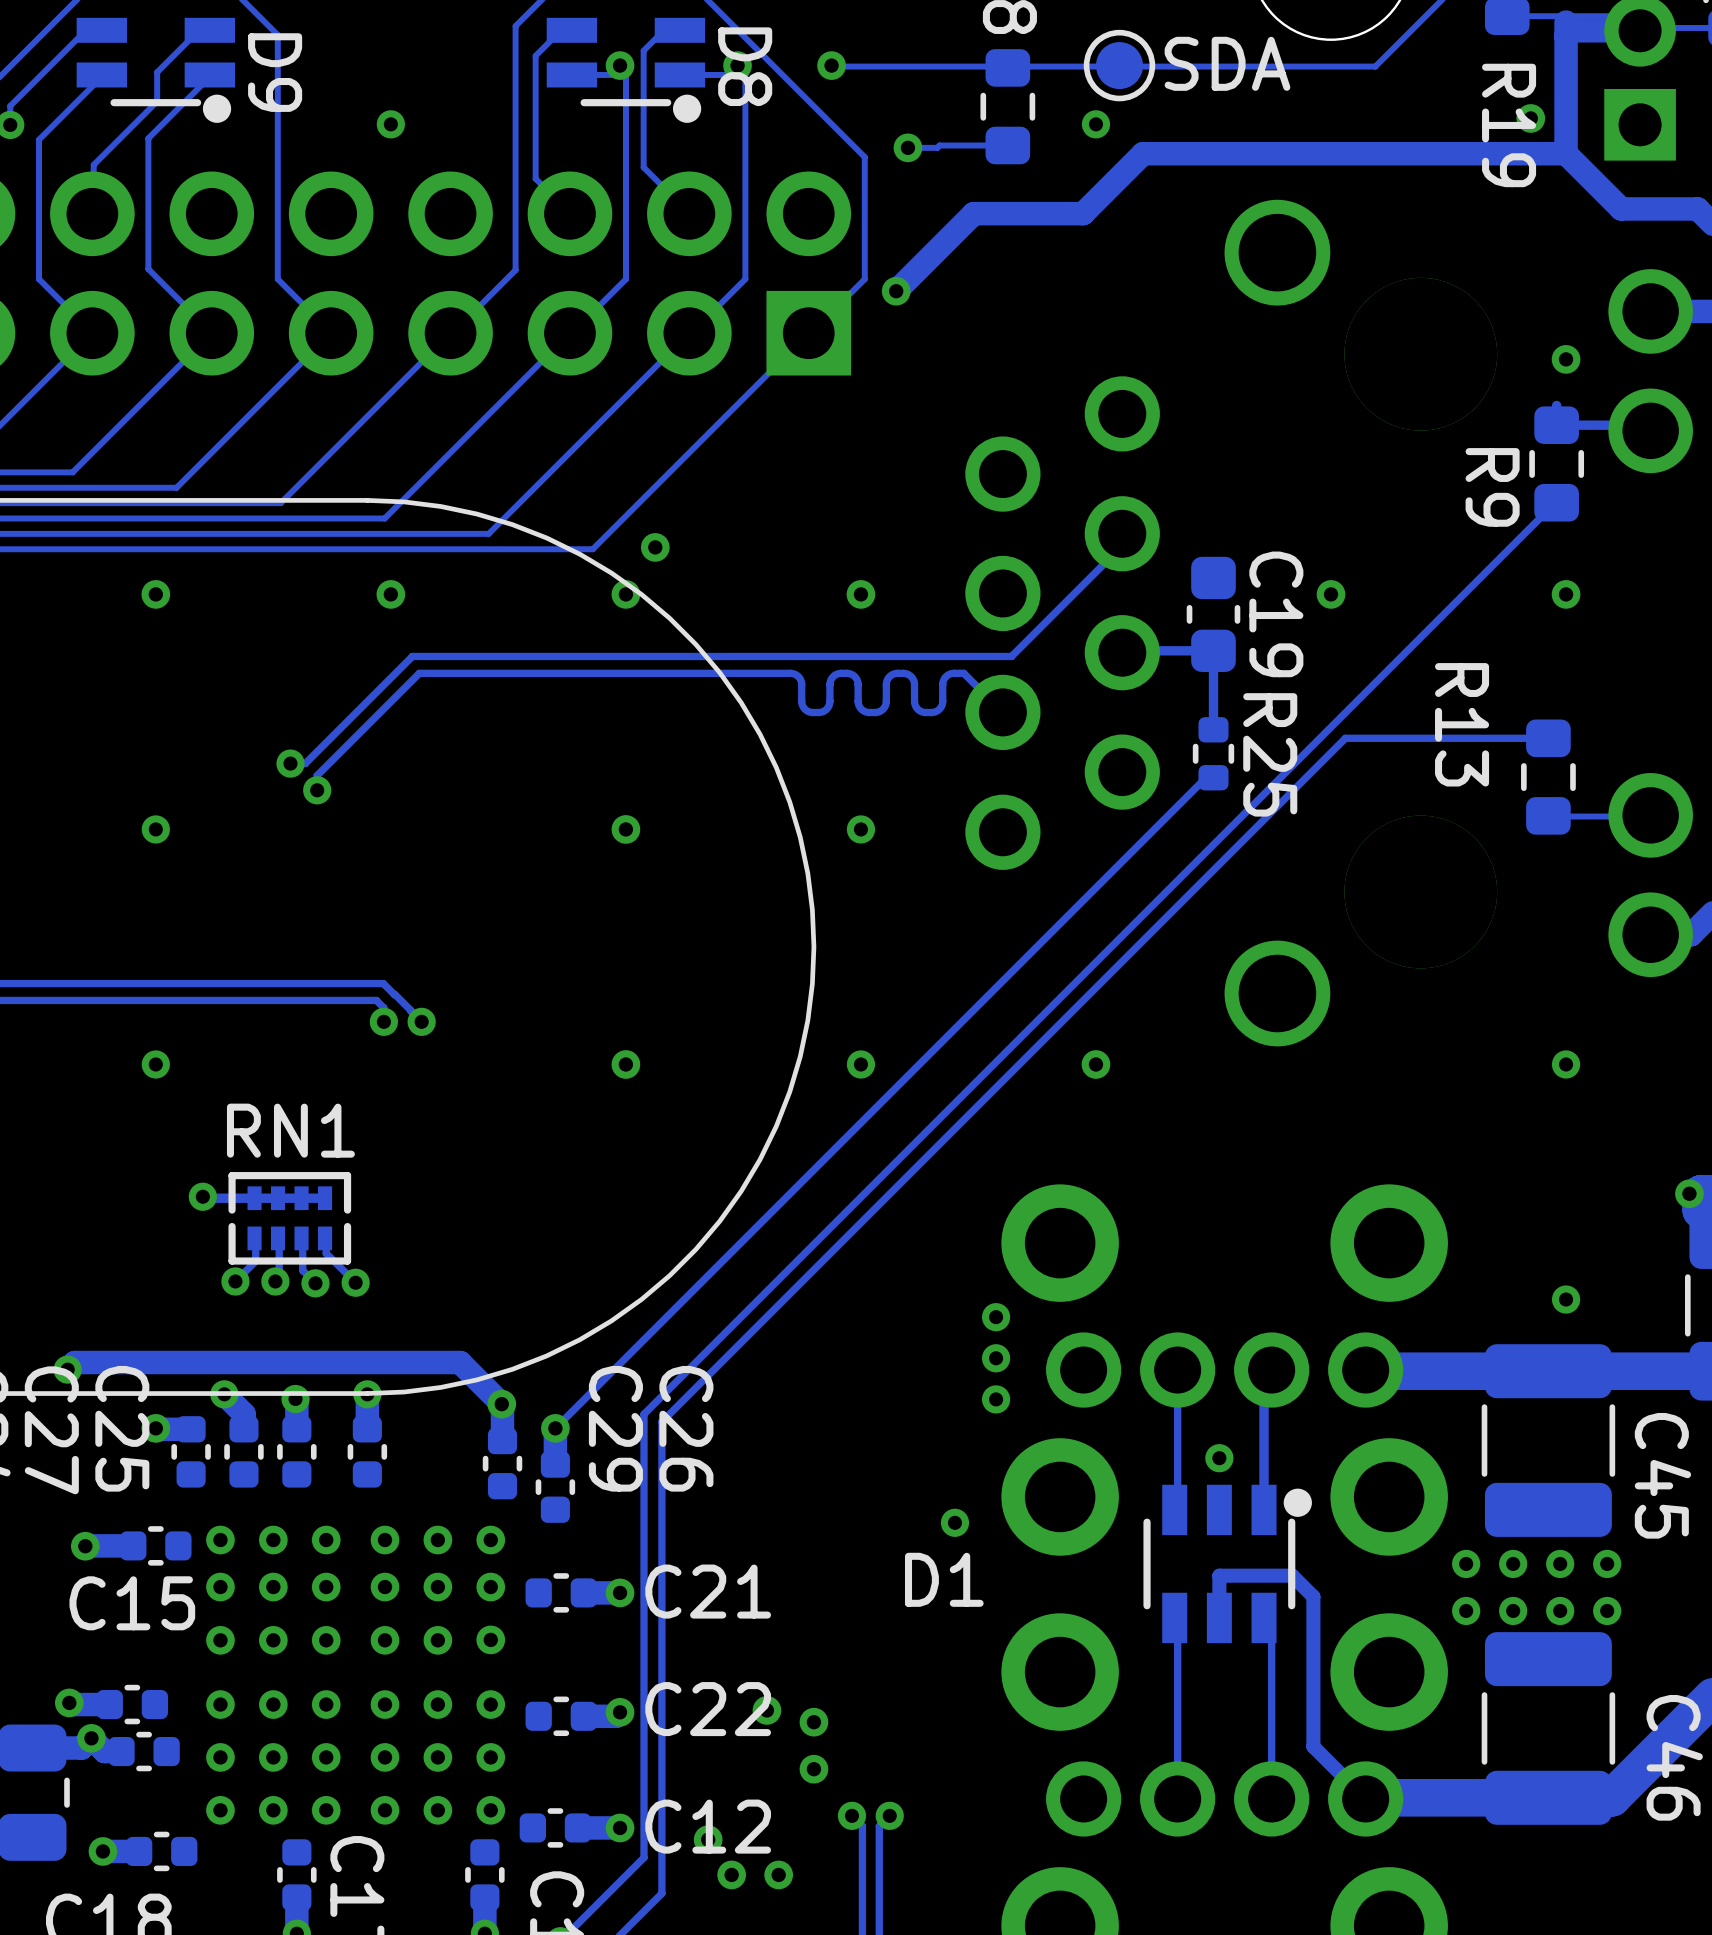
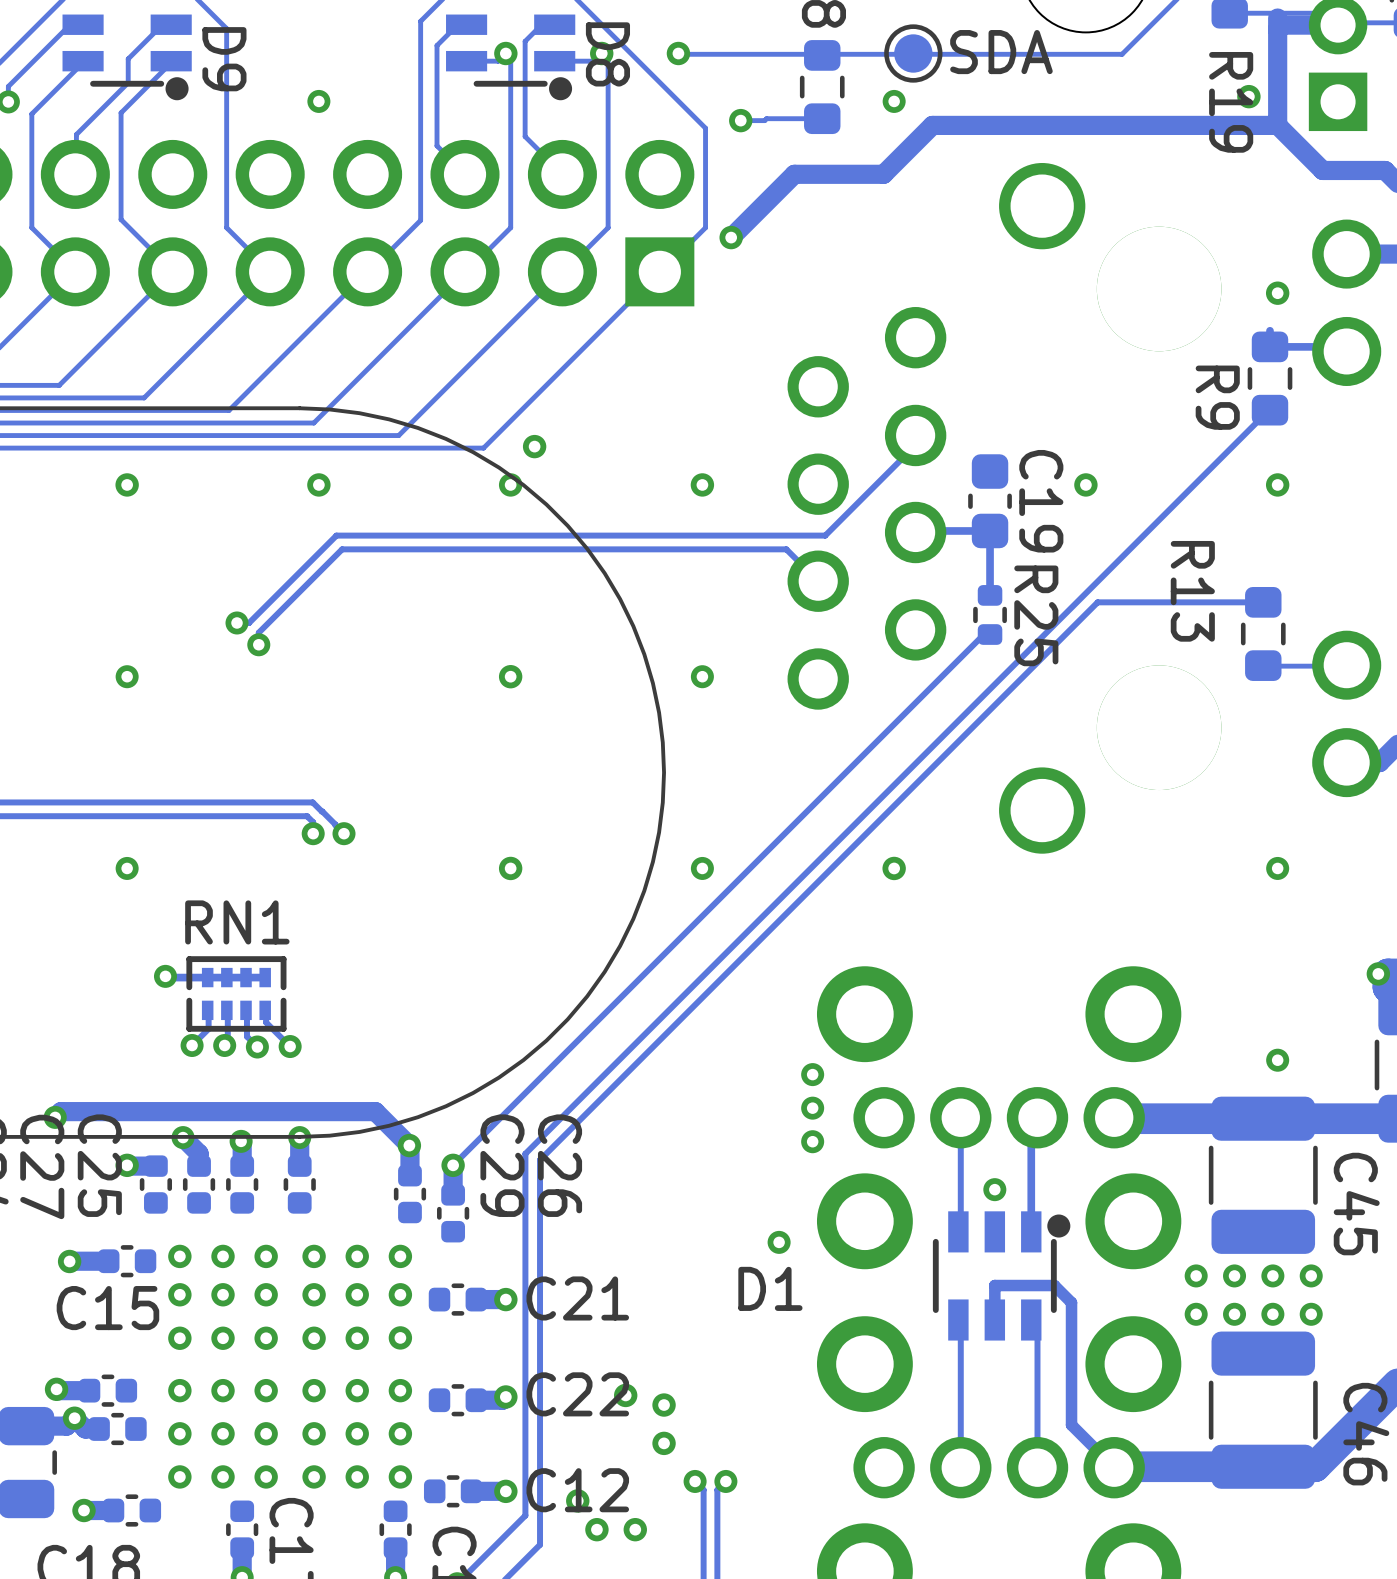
track: (841, 673) (831, 678) (829, 704) (825, 710) (818, 712) (809, 711) (804, 708) (801, 702) (801, 680) (797, 675) (790, 673) -> (686, 549) (644, 549)
track: (897, 673) (888, 678) (885, 704) (881, 710) (875, 712) (865, 711) (860, 708) (858, 702) (857, 680) (853, 675) (846, 673) -> (732, 549) (690, 549)
track: (954, 673) (948, 675) (943, 680) (941, 707) (931, 712) (922, 711) (916, 708) (914, 702) (913, 680) (909, 675) (903, 673) -> (778, 549) (736, 549)

